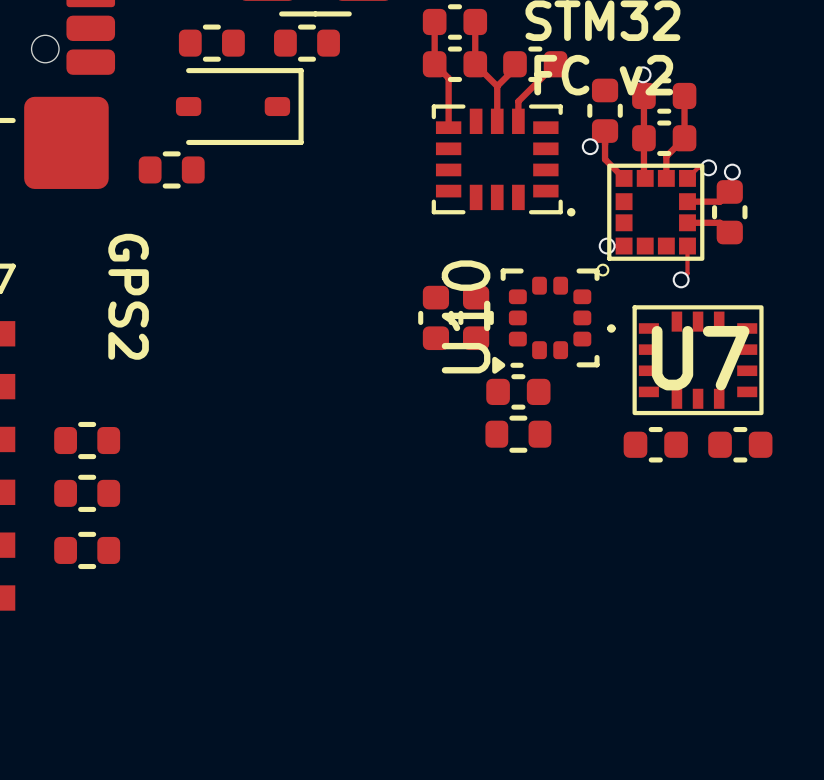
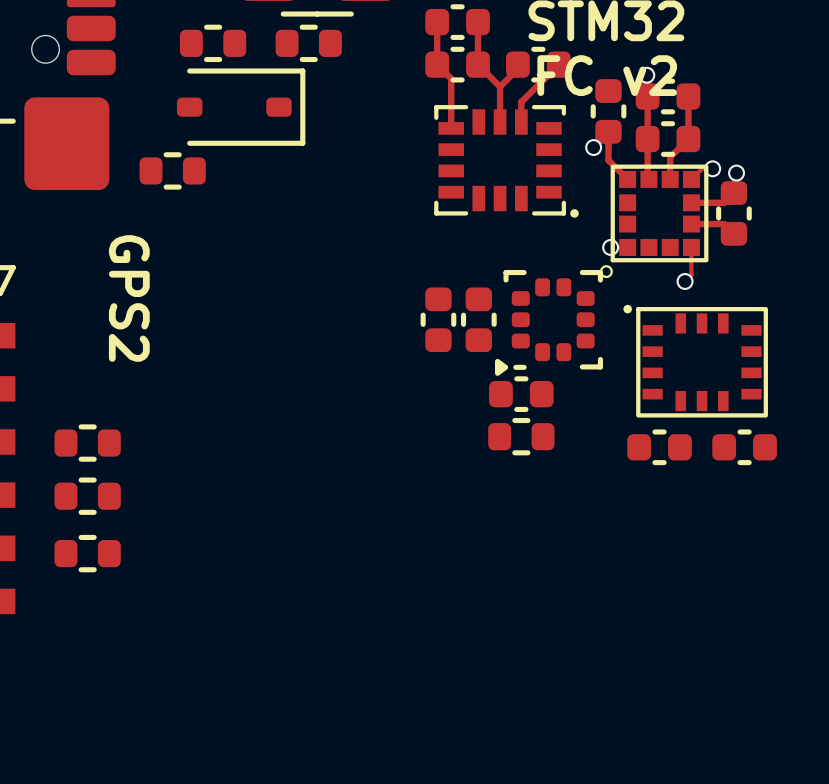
U10 name: U10 (466, 316) -> none
part: none -> (695, 361)
U7: (685, 360) -> none

